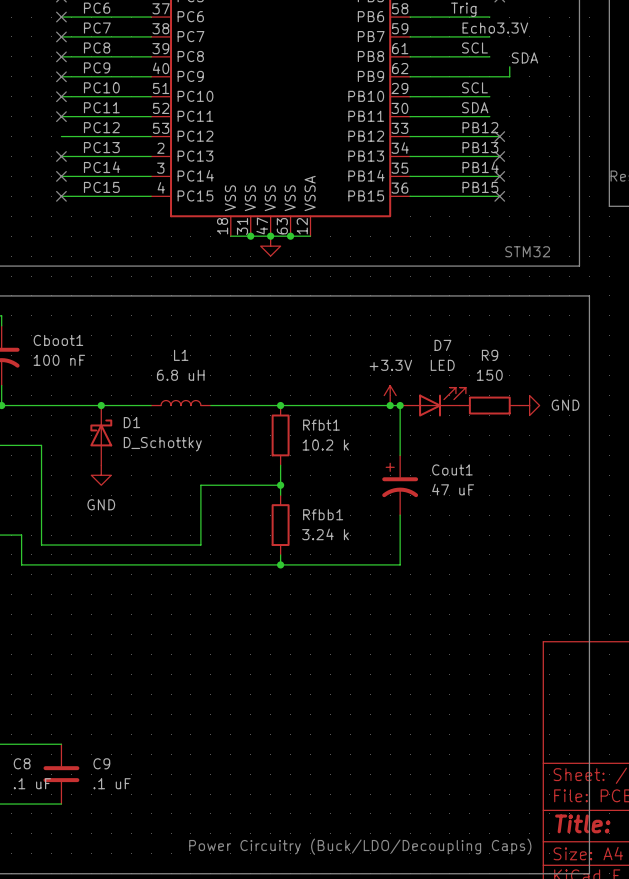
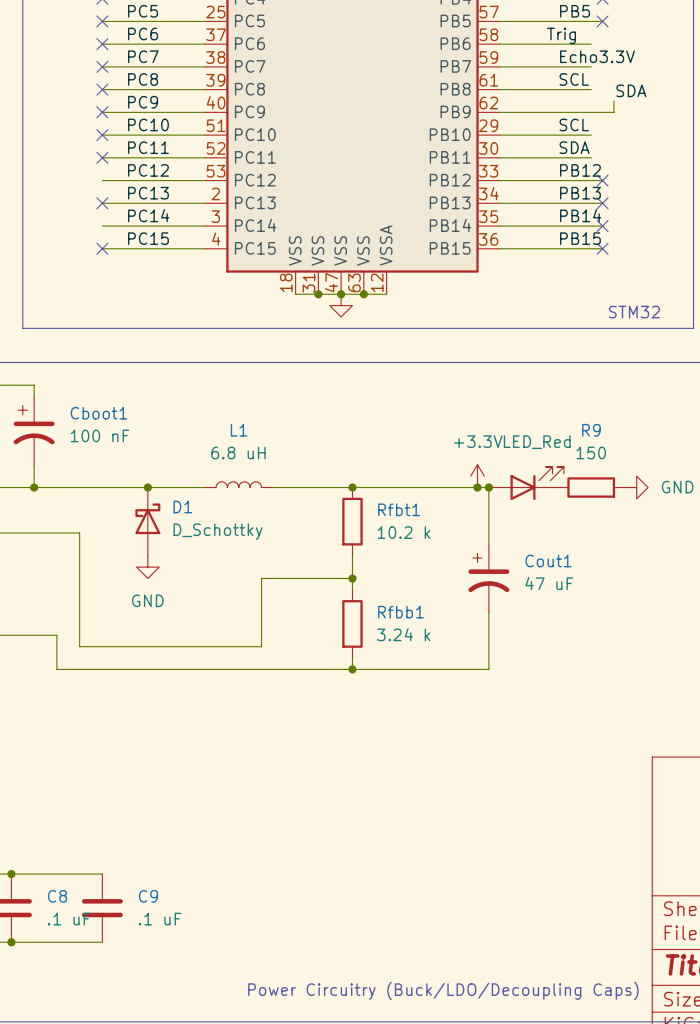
no-connect mark: (61, 176) -> none
D7 name: D7 (442, 345) -> none
D7 value: LED (442, 365) -> LED_Red (537, 442)

